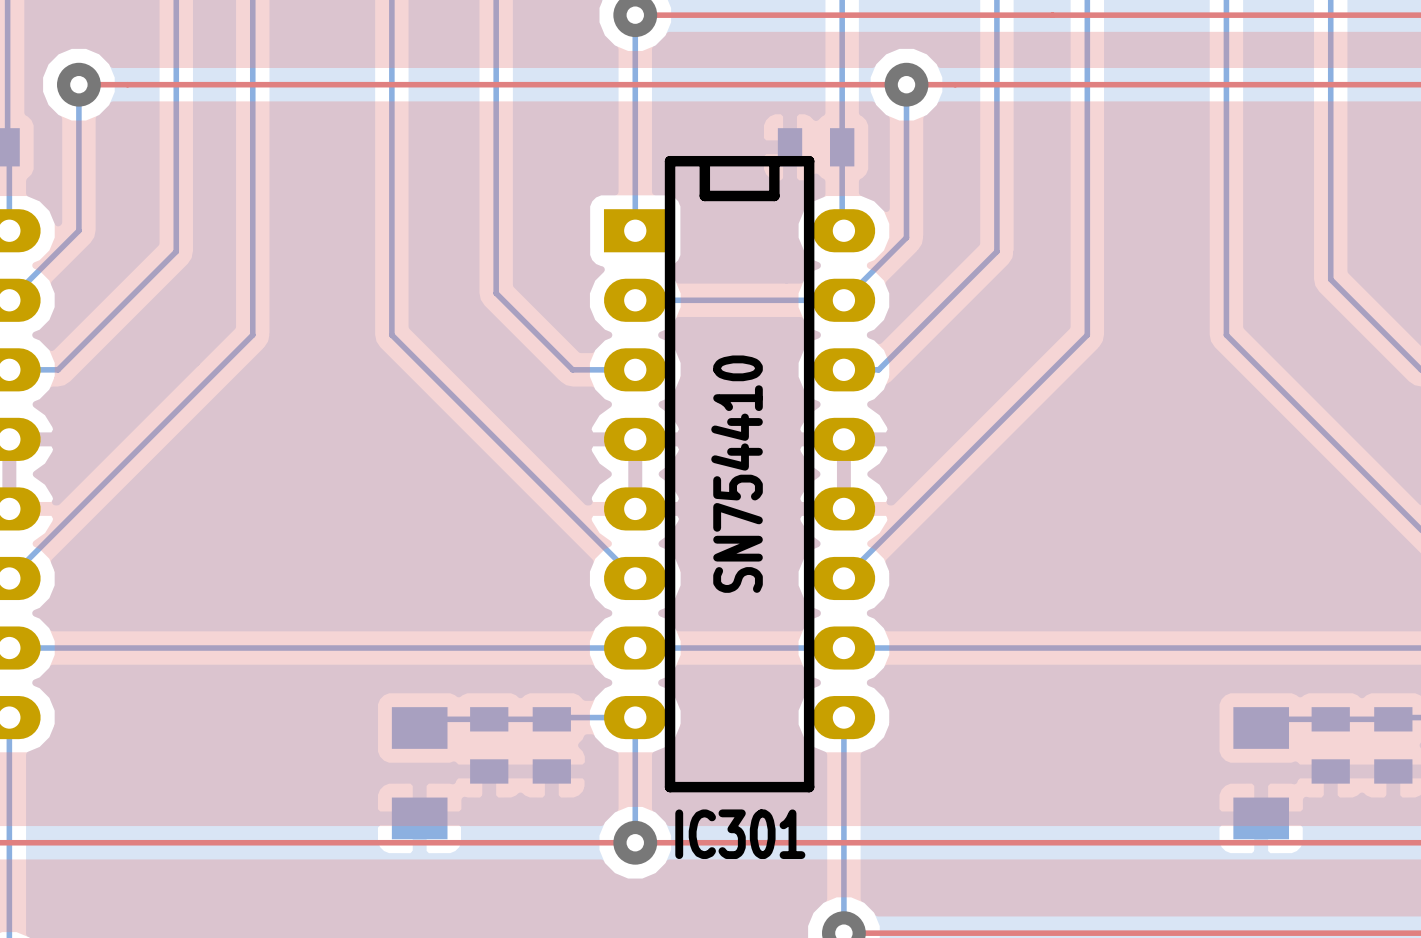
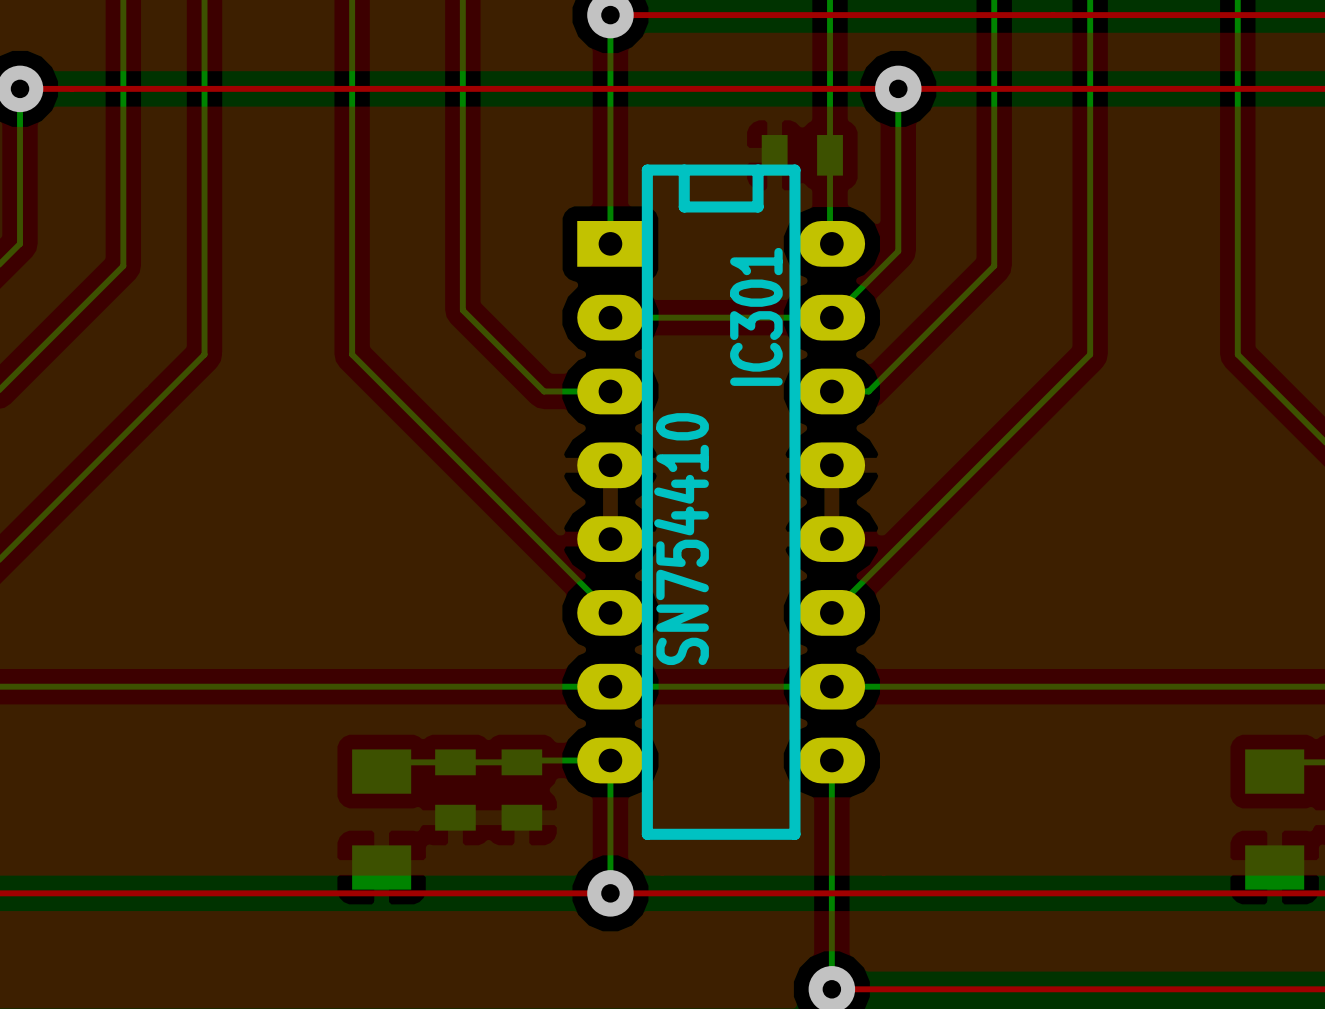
IC301 value position: SN754410 (737, 474) -> SN754410 (681, 539)
IC301 name rotation: 0° (740, 834) -> 90° counterclockwise (756, 316)
IC301 name position: IC301 (740, 834) -> IC301 (756, 316)

